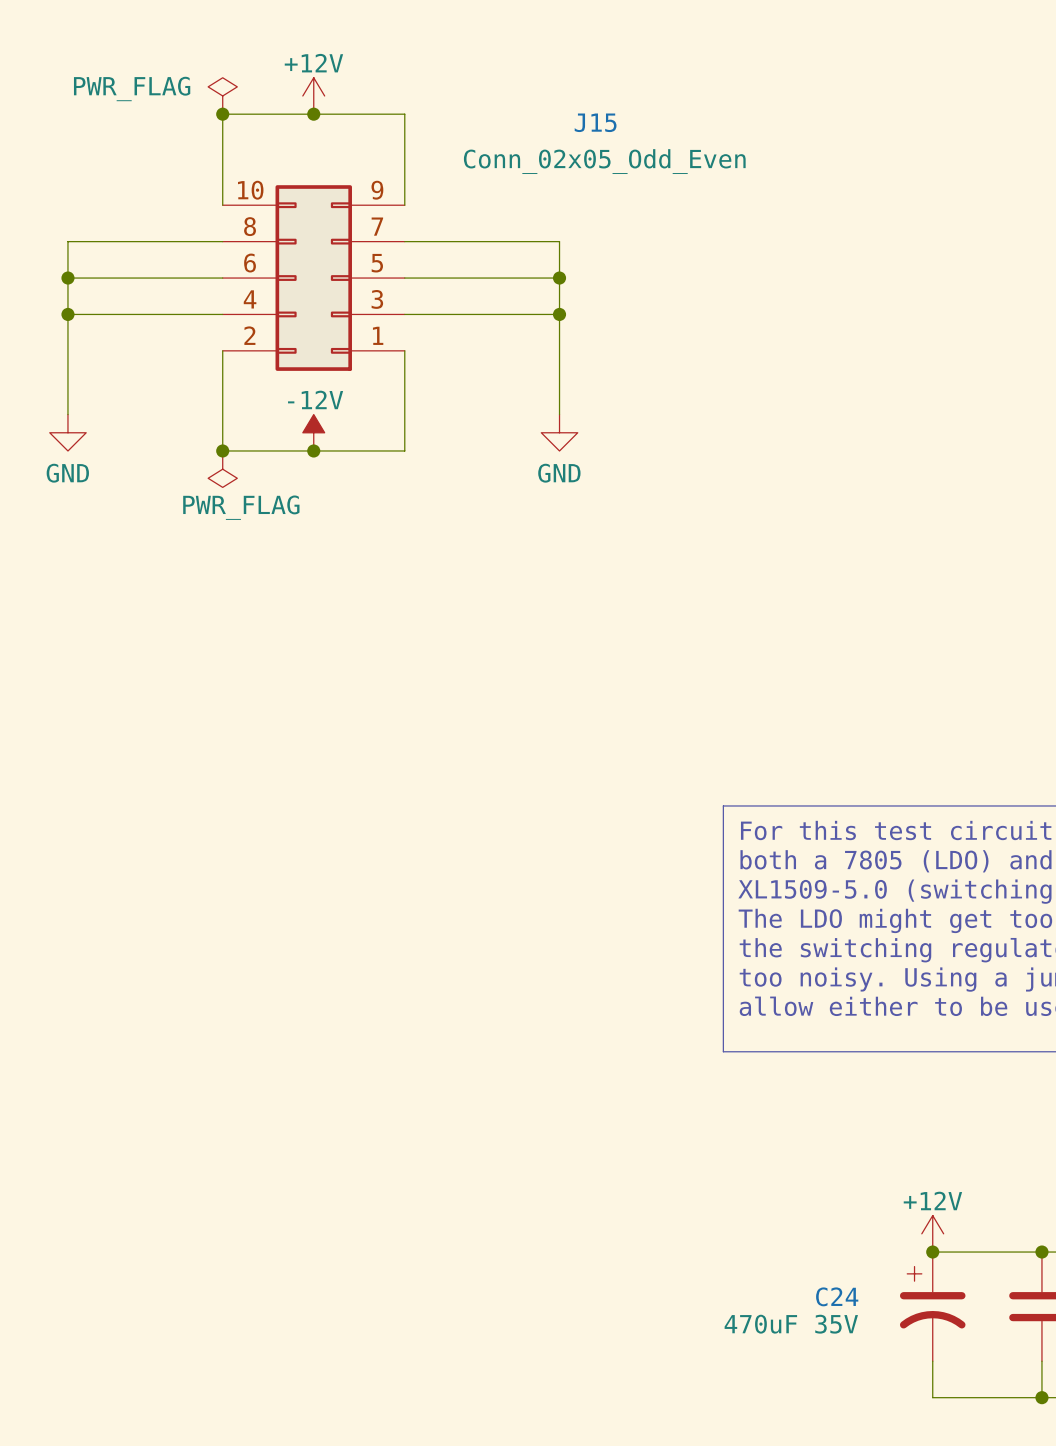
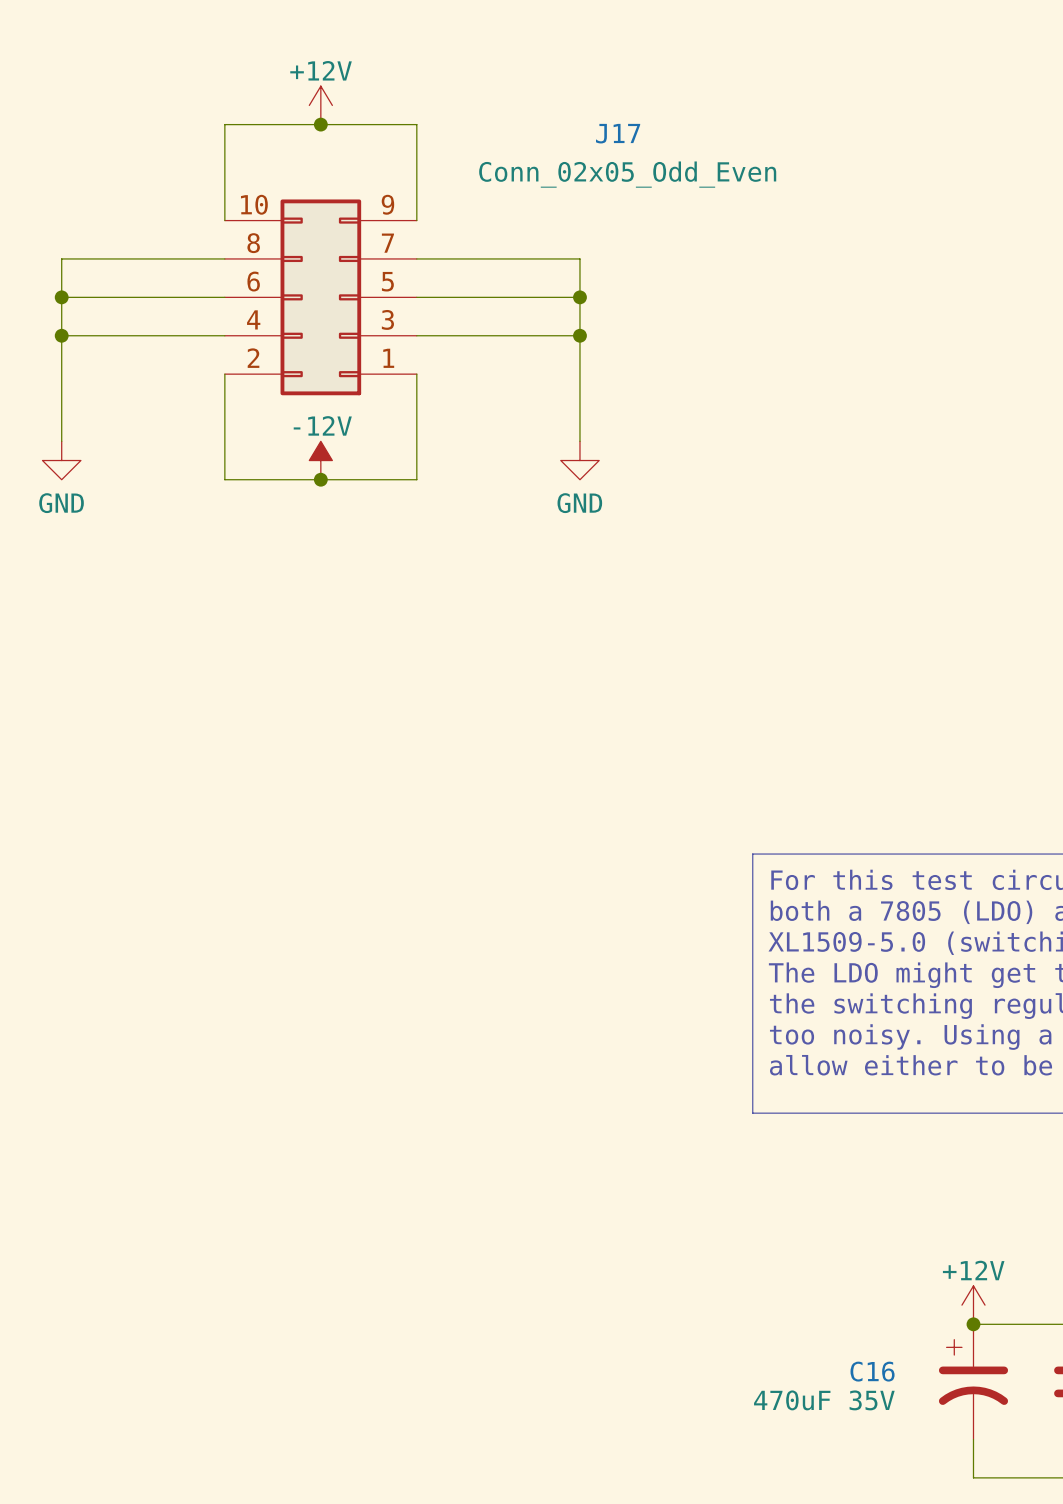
power symbol: PWR_FLAG (222, 95) -> none
junction: (222, 114) -> none
J15 name: J15 (595, 122) -> J17 (618, 133)
junction: (222, 450) -> none
power symbol: PWR_FLAG (222, 469) -> none
C24 name: C24 (837, 1296) -> C16 (872, 1371)

